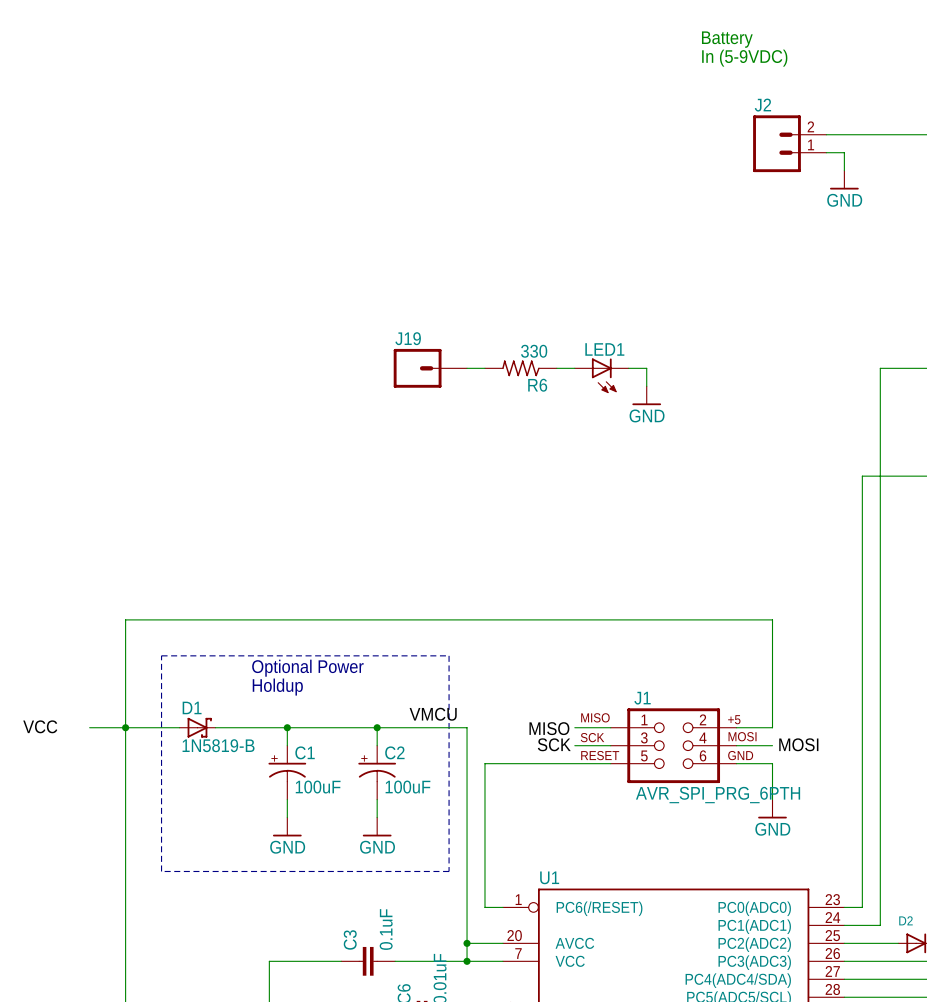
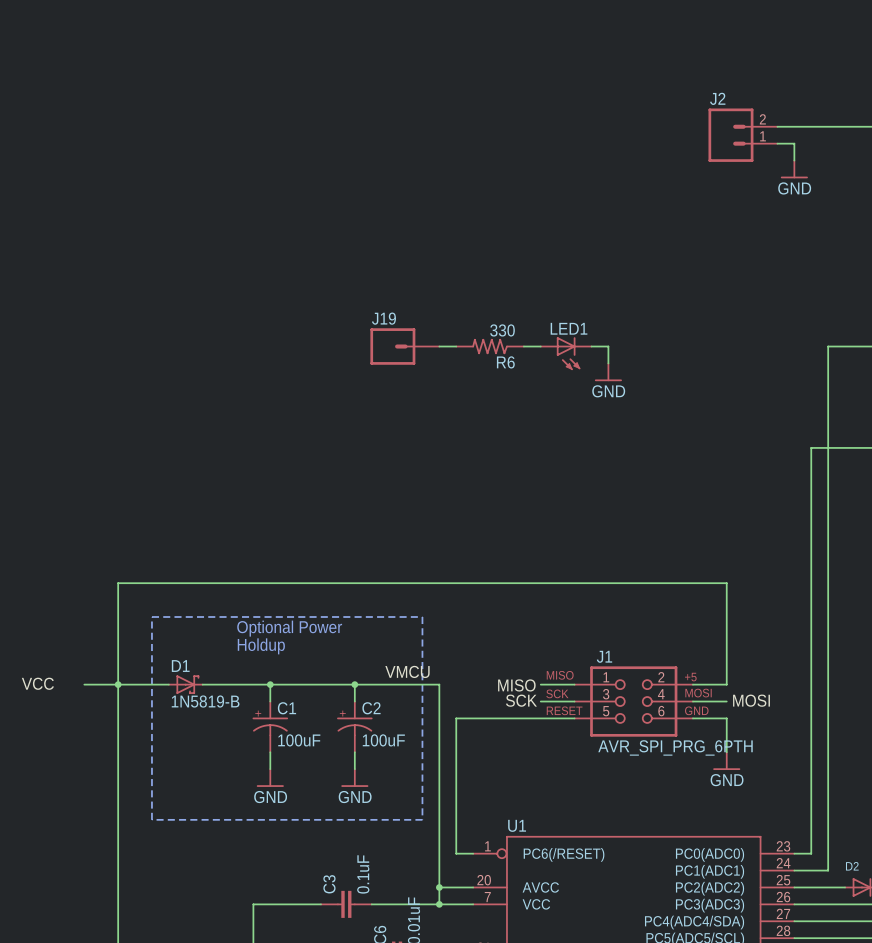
text: Battery (727, 39) -> none
text: In (5-9VDC) (744, 58) -> none

